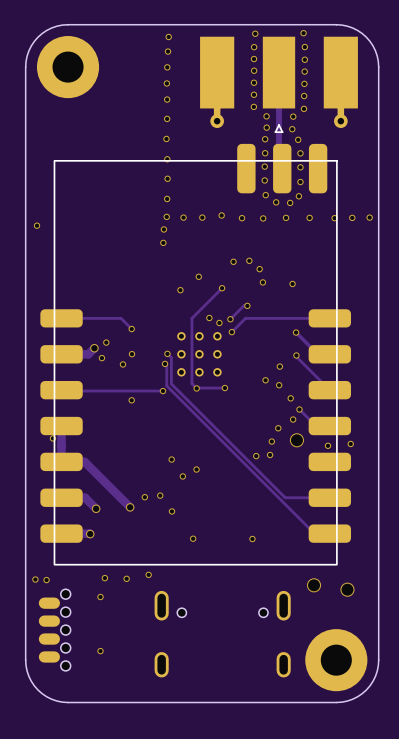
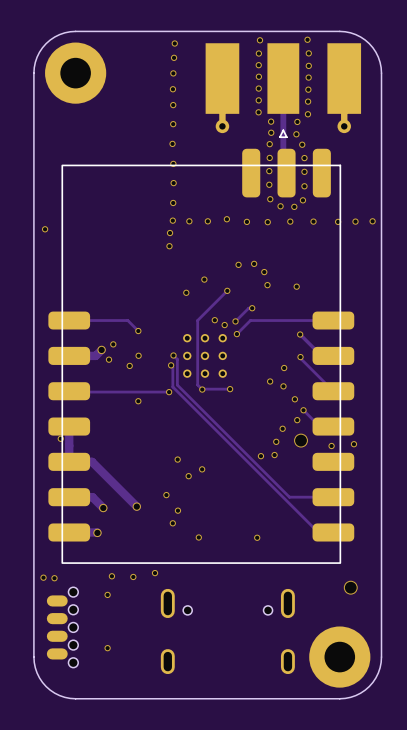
via position: (144, 497) -> (172, 523)
via: (314, 585) -> none

